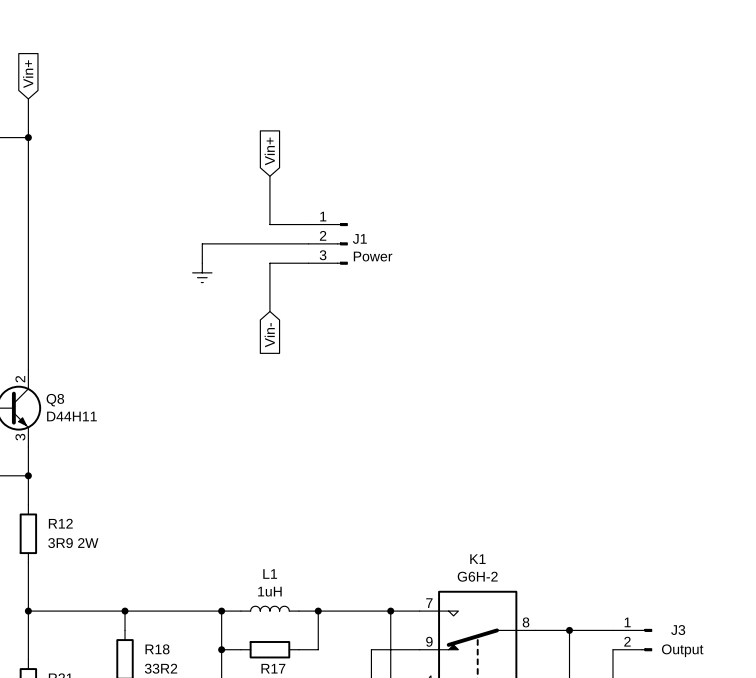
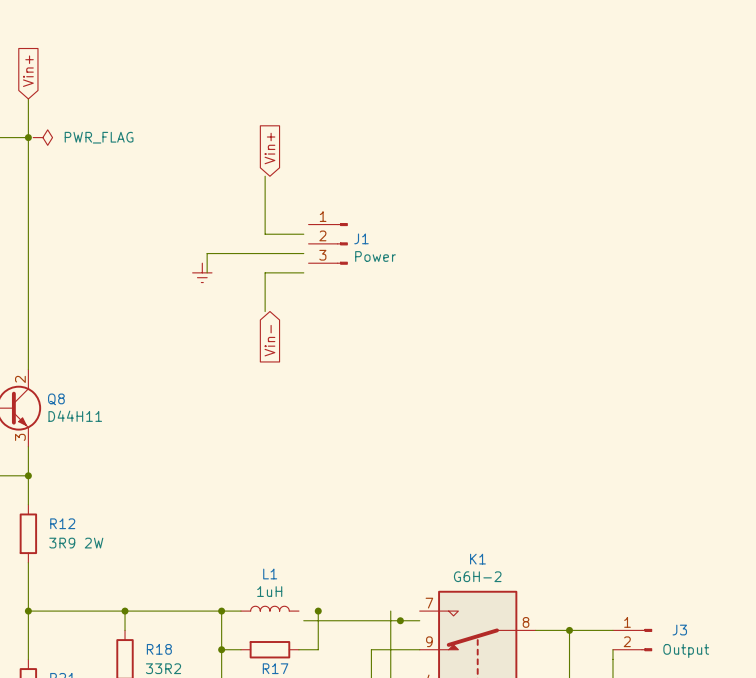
power symbol: none -> PWR_FLAG (42, 137)
wire: none -> (265, 176) (265, 234) (303, 234)
wire: (269, 176) (269, 224) (308, 224) -> none
wire: (308, 243) (202, 243) (202, 263) -> none
wire: none -> (303, 253) (207, 253) (207, 272)
wire: (308, 263) (269, 263) (269, 311) -> none
wire: none -> (303, 272) (265, 272) (265, 311)
wire: (298, 611) (419, 611) -> none
junction position: (390, 611) -> (400, 620)
wire: none -> (303, 620) (419, 620)

